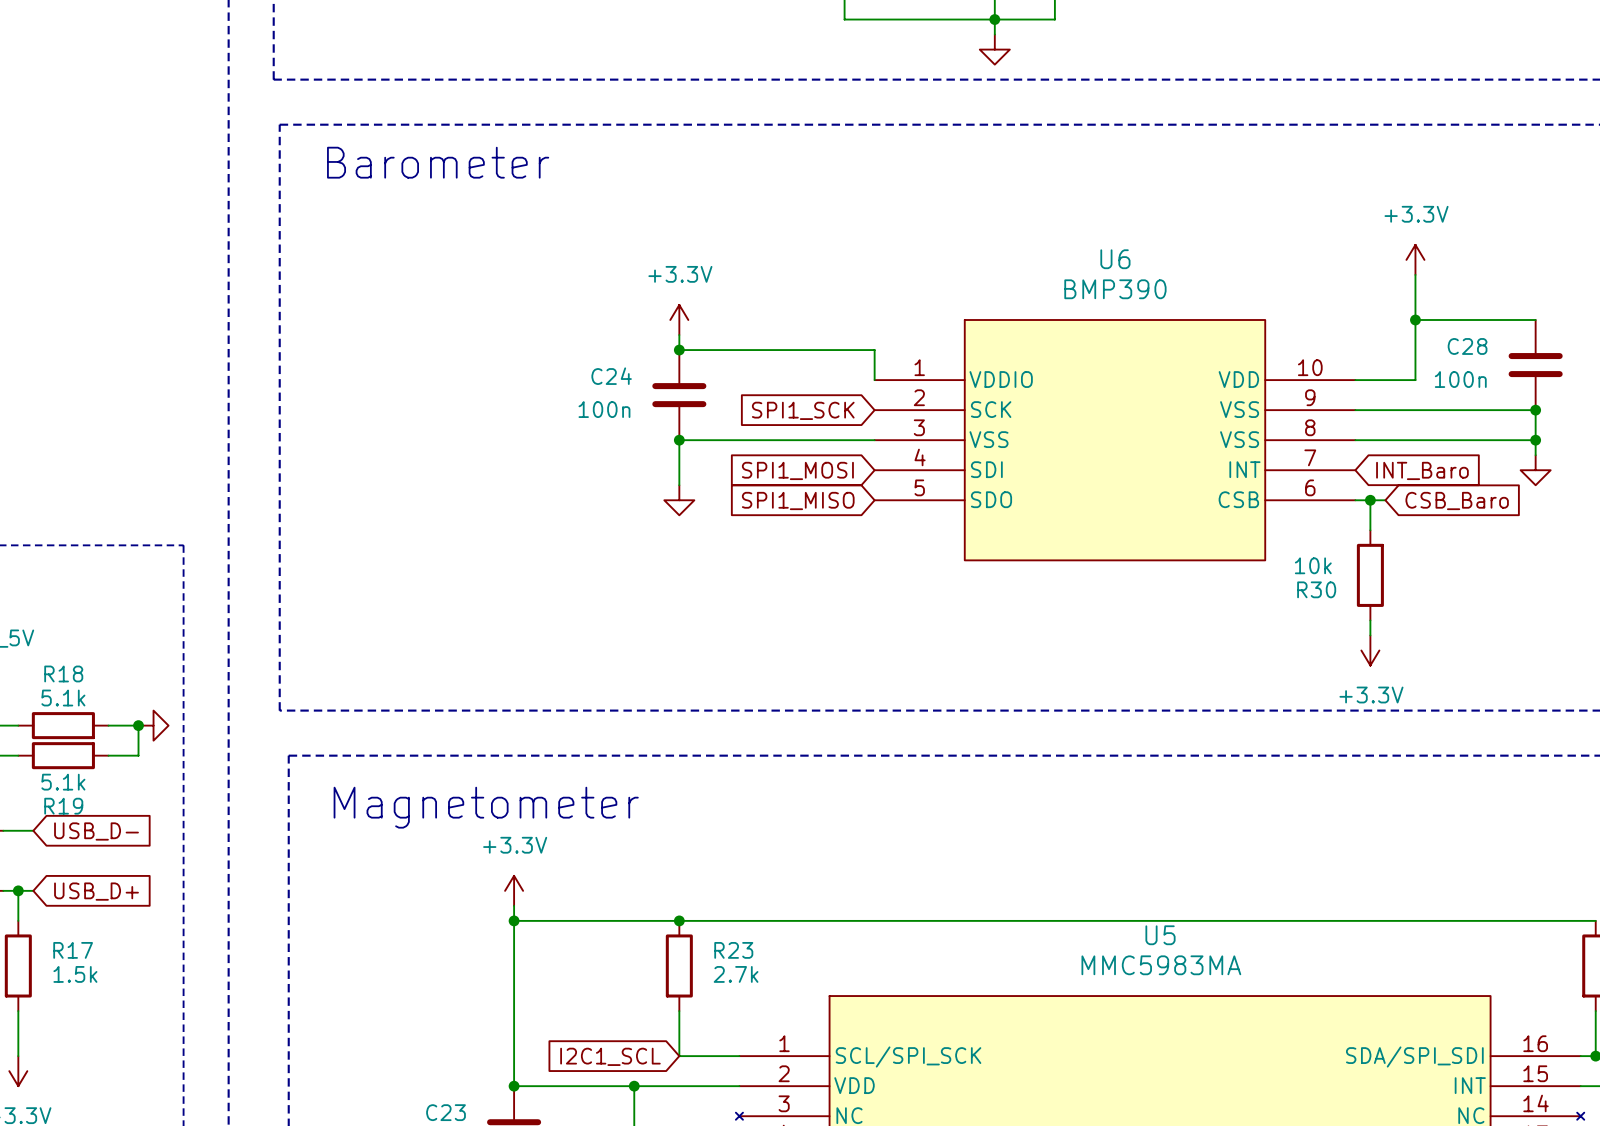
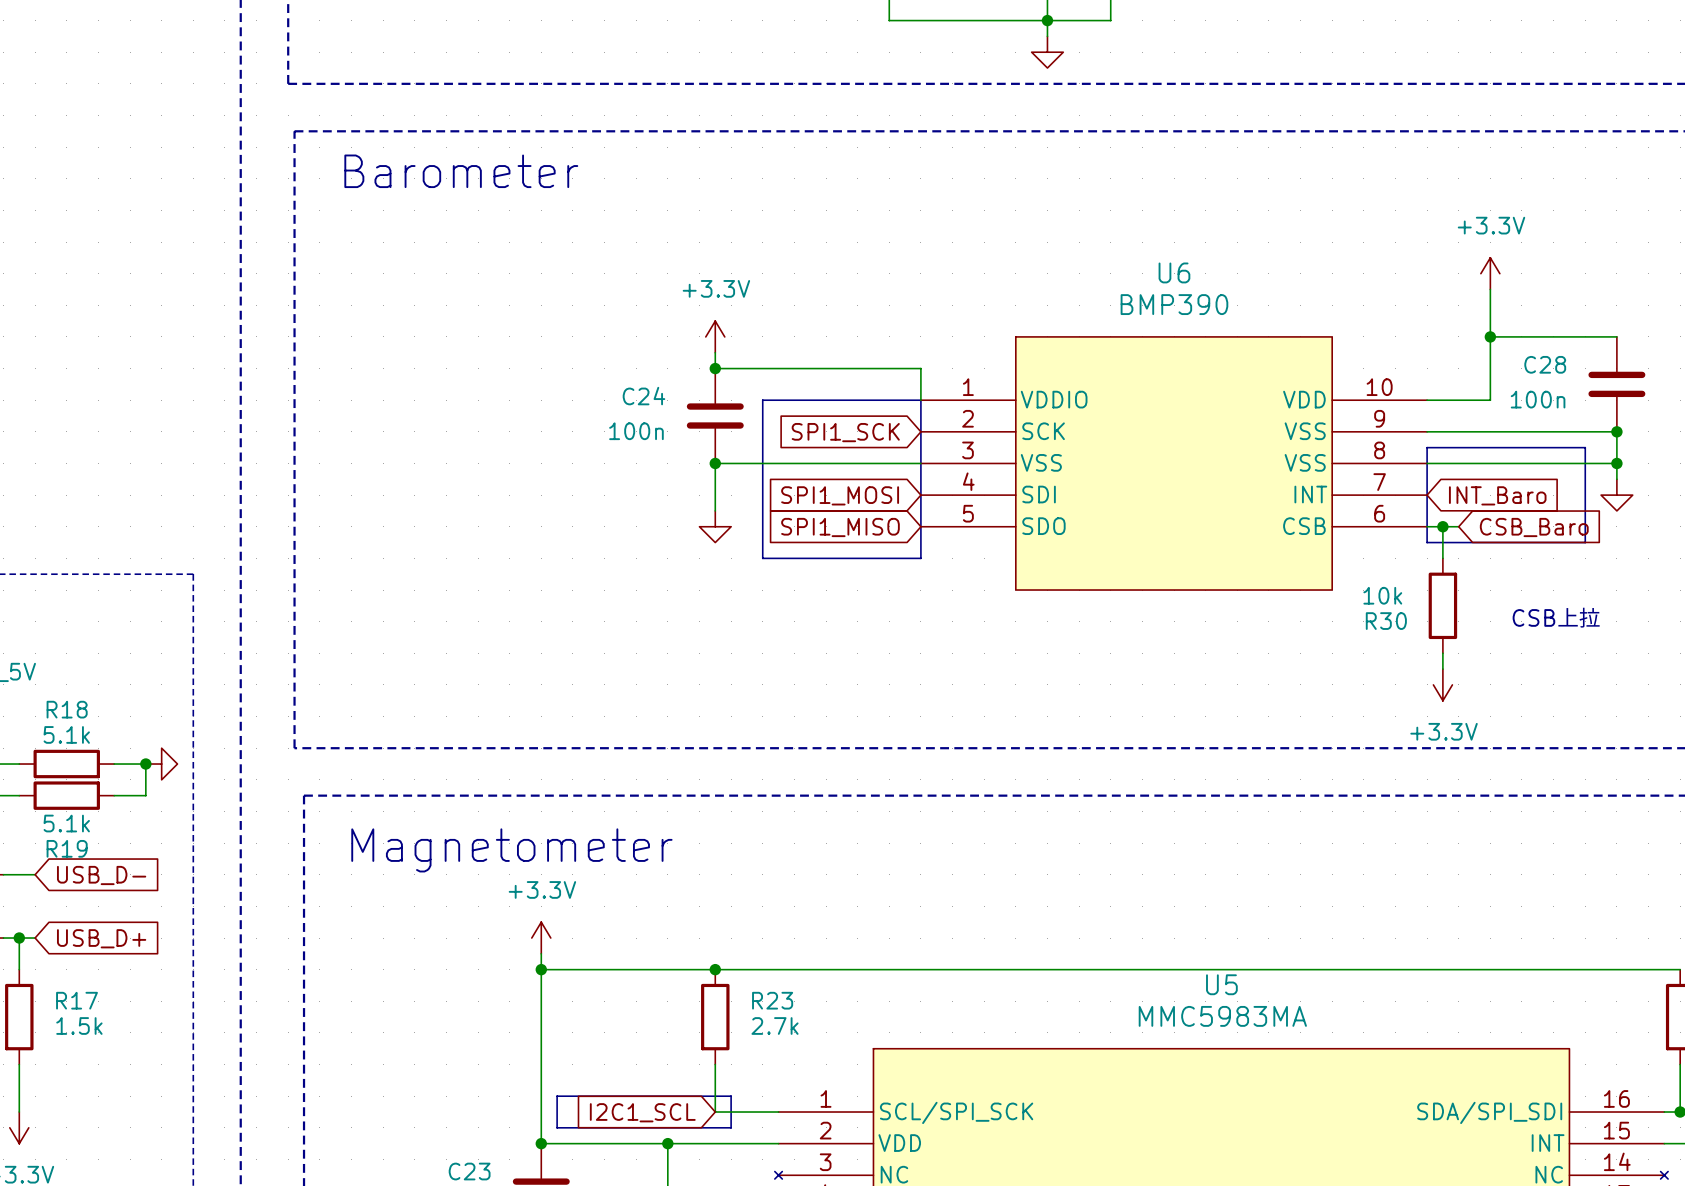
line: none -> (762, 400) (920, 400) (920, 558) (762, 558) (762, 400)
line: none -> (1427, 447) (1585, 447) (1585, 542) (1427, 542) (1427, 447)
text: none -> CSB上拉 (1556, 617)
line: none -> (557, 1096) (731, 1096) (731, 1127) (557, 1127) (557, 1096)

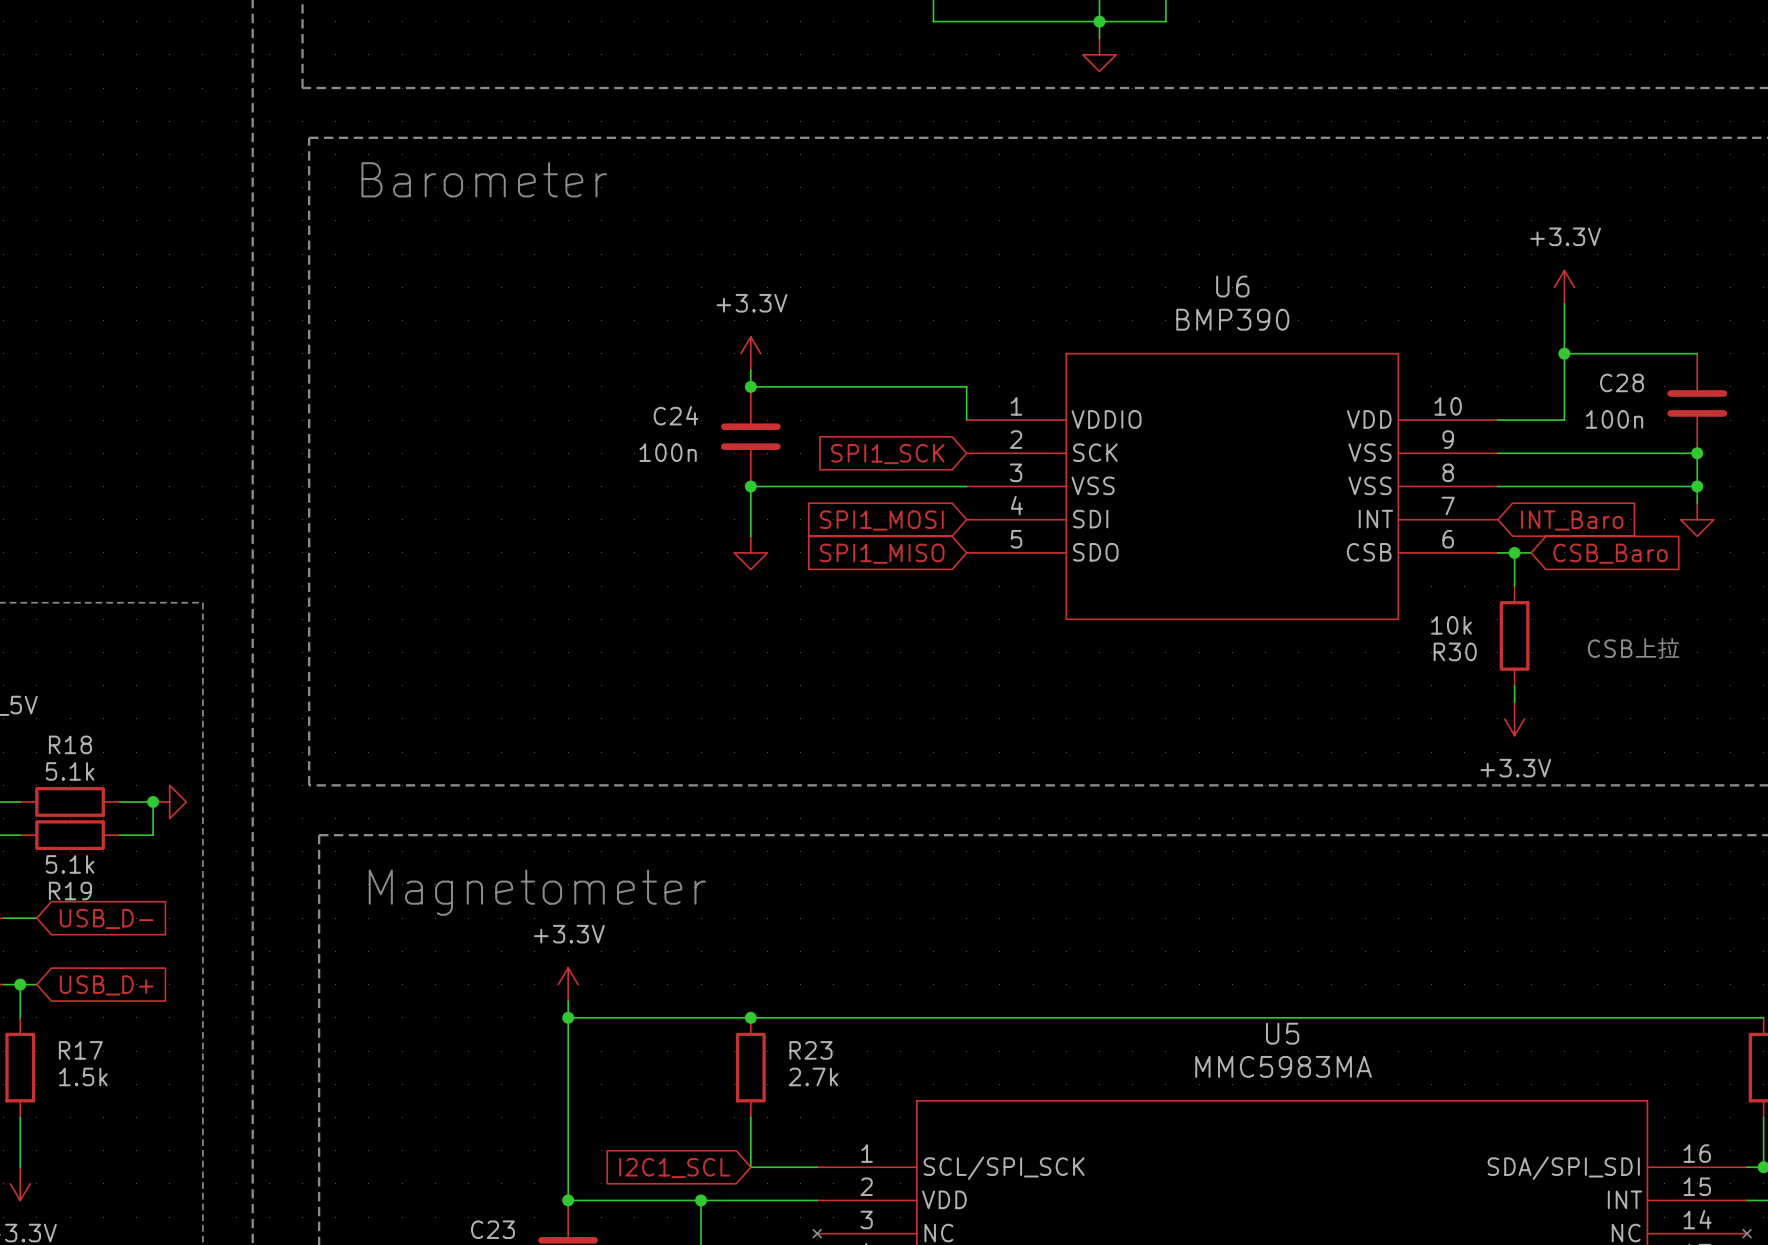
line: (762, 400) (920, 400) (920, 558) (762, 558) (762, 400) -> none
line: (1427, 447) (1585, 447) (1585, 542) (1427, 542) (1427, 447) -> none
line: (557, 1096) (731, 1096) (731, 1127) (557, 1127) (557, 1096) -> none

